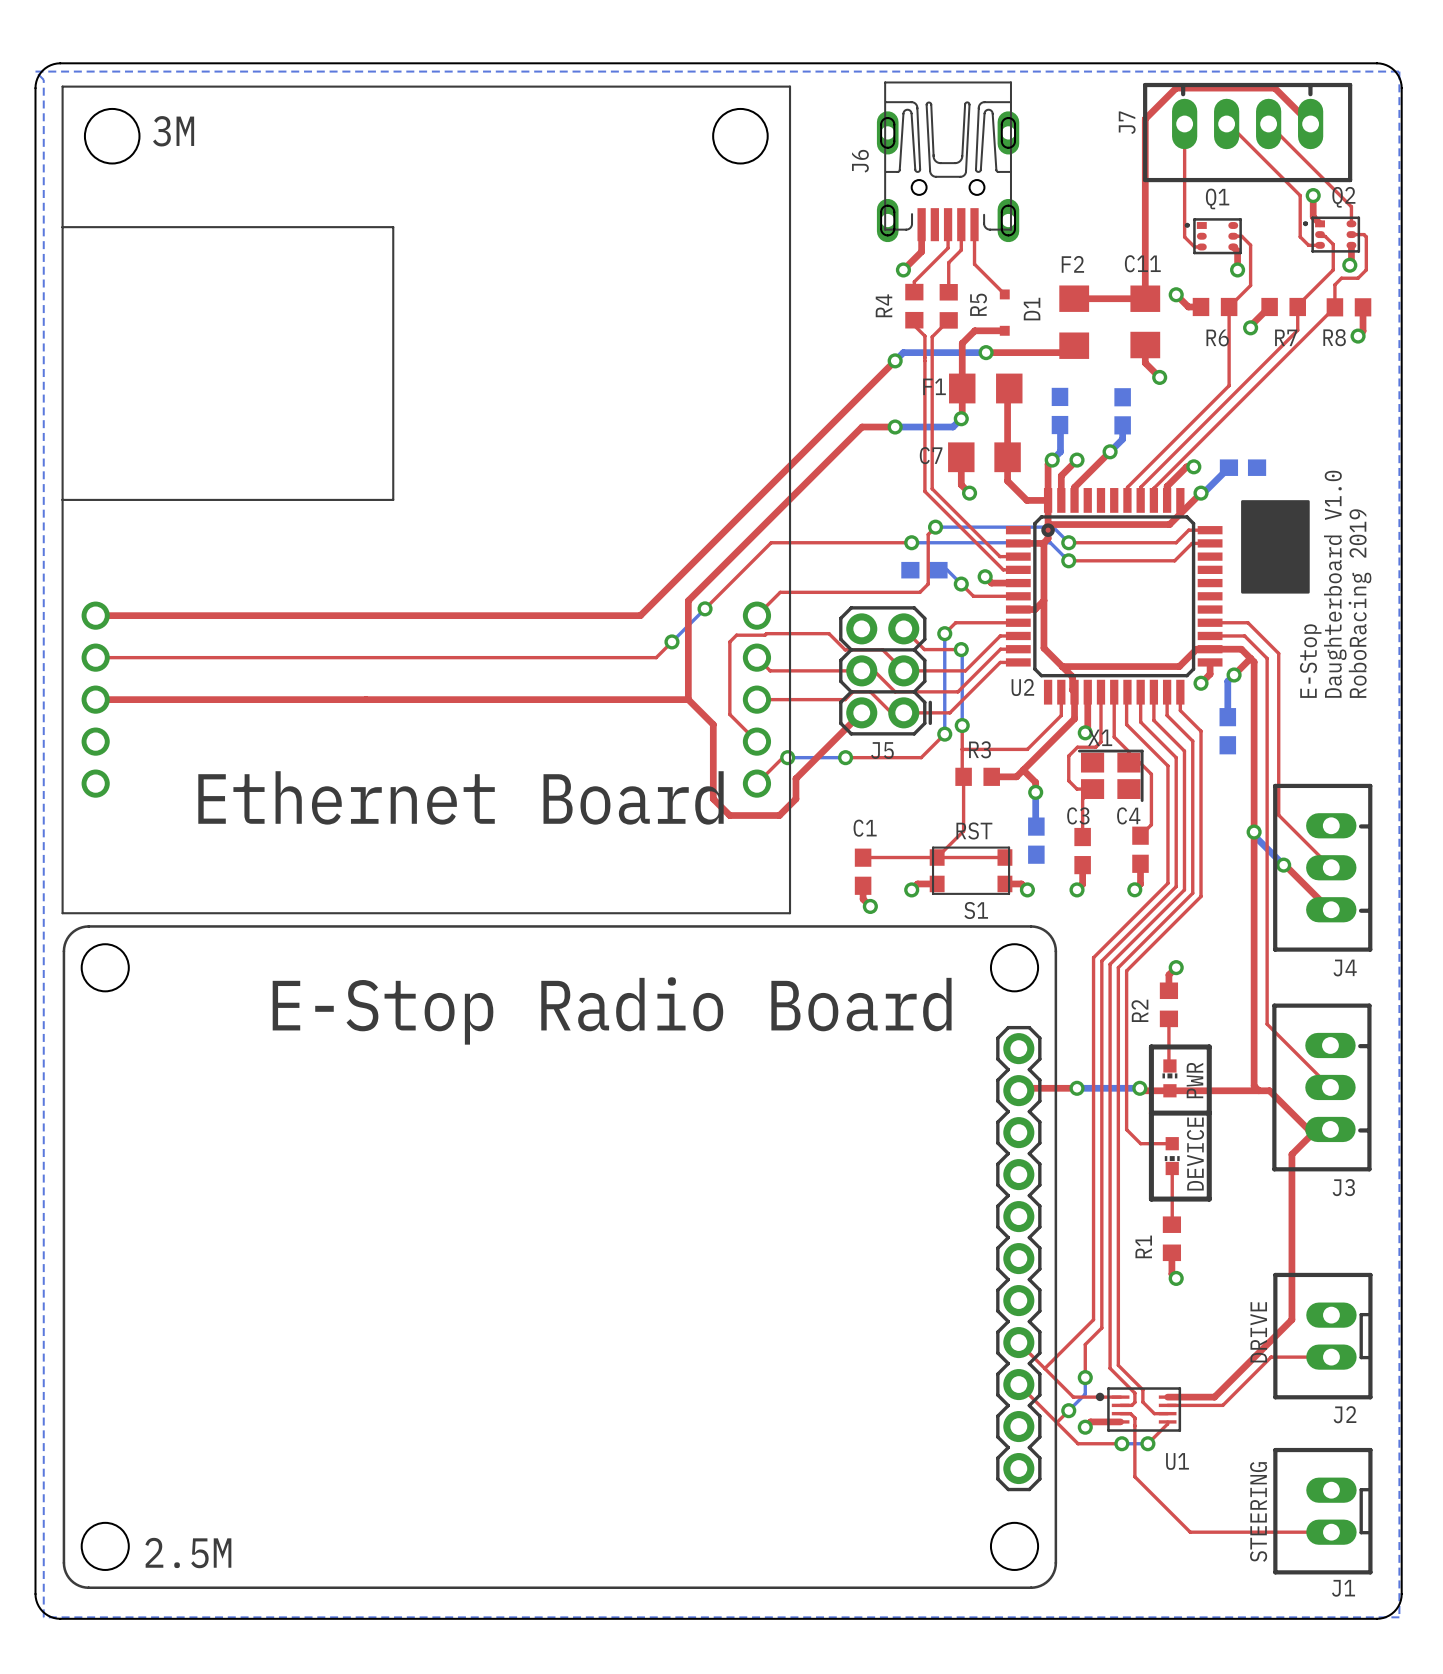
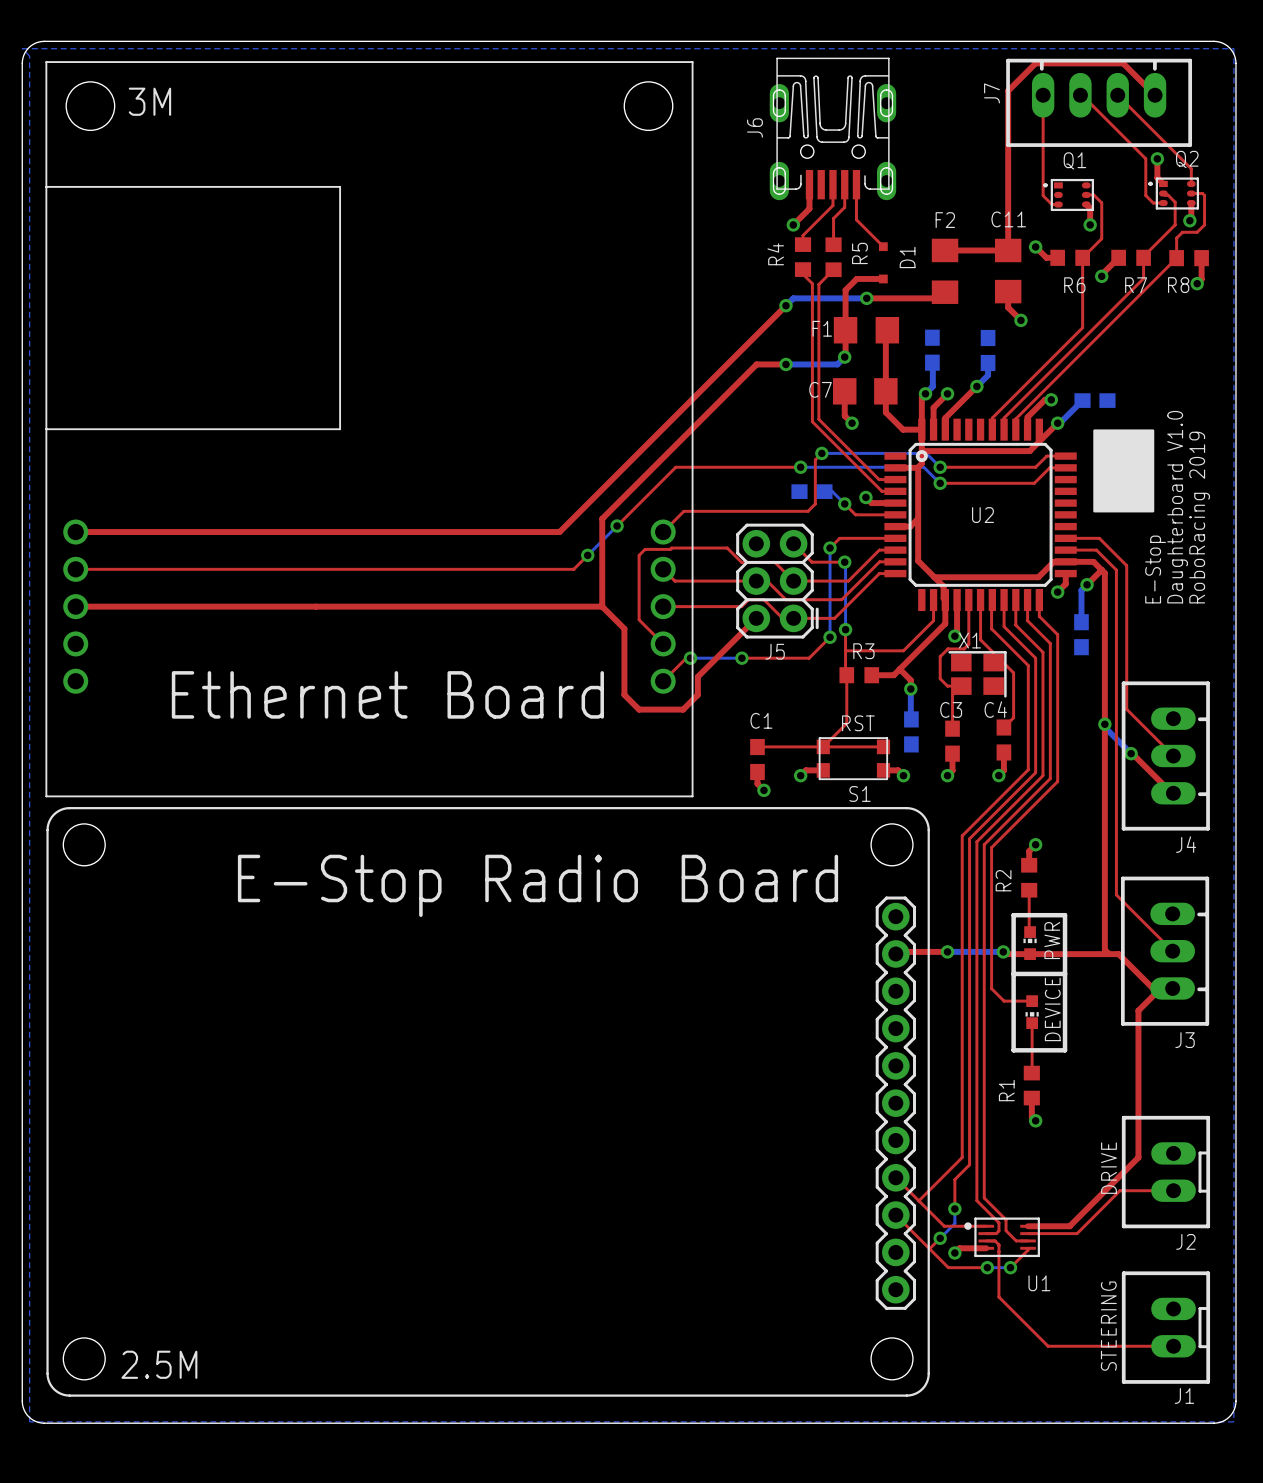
U2 name position: U2 (1022, 687) -> U2 (982, 515)

